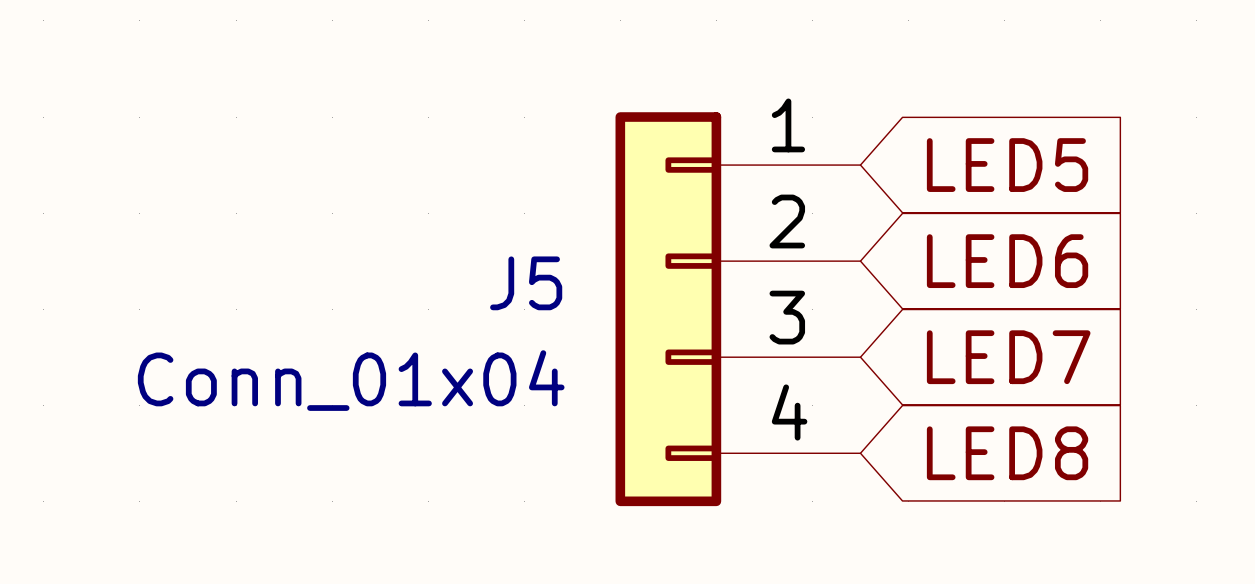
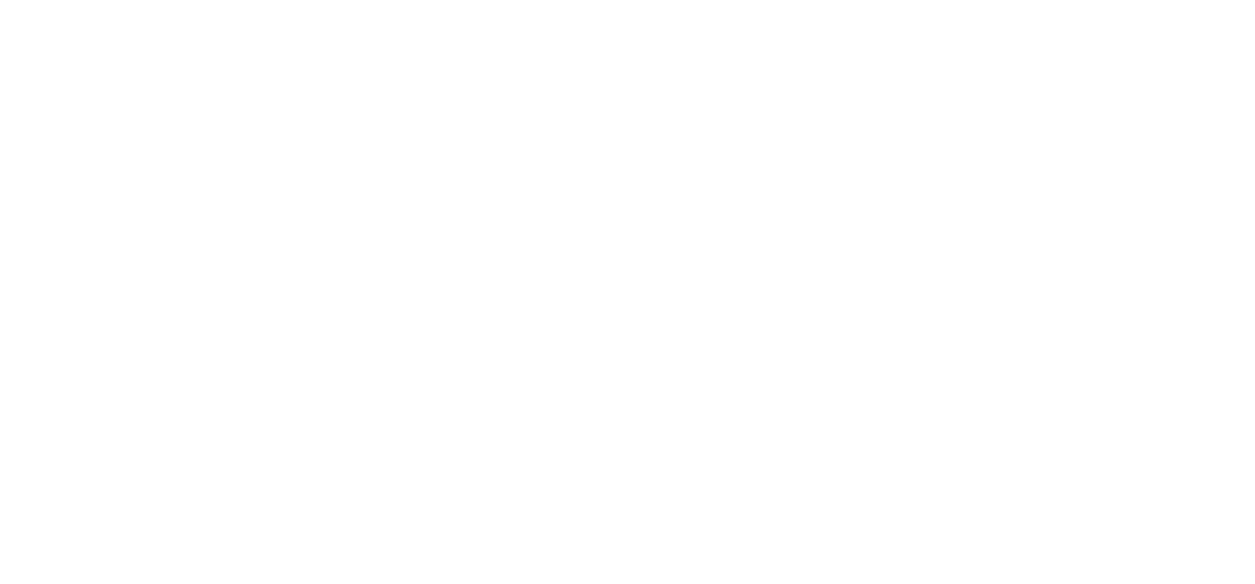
global label: LED5 (1007, 165) -> none
global label: LED6 (1007, 261) -> none
J5: Conn_01x04 (738, 309) -> none
global label: LED7 (1008, 357) -> none
global label: LED8 (1007, 453) -> none

